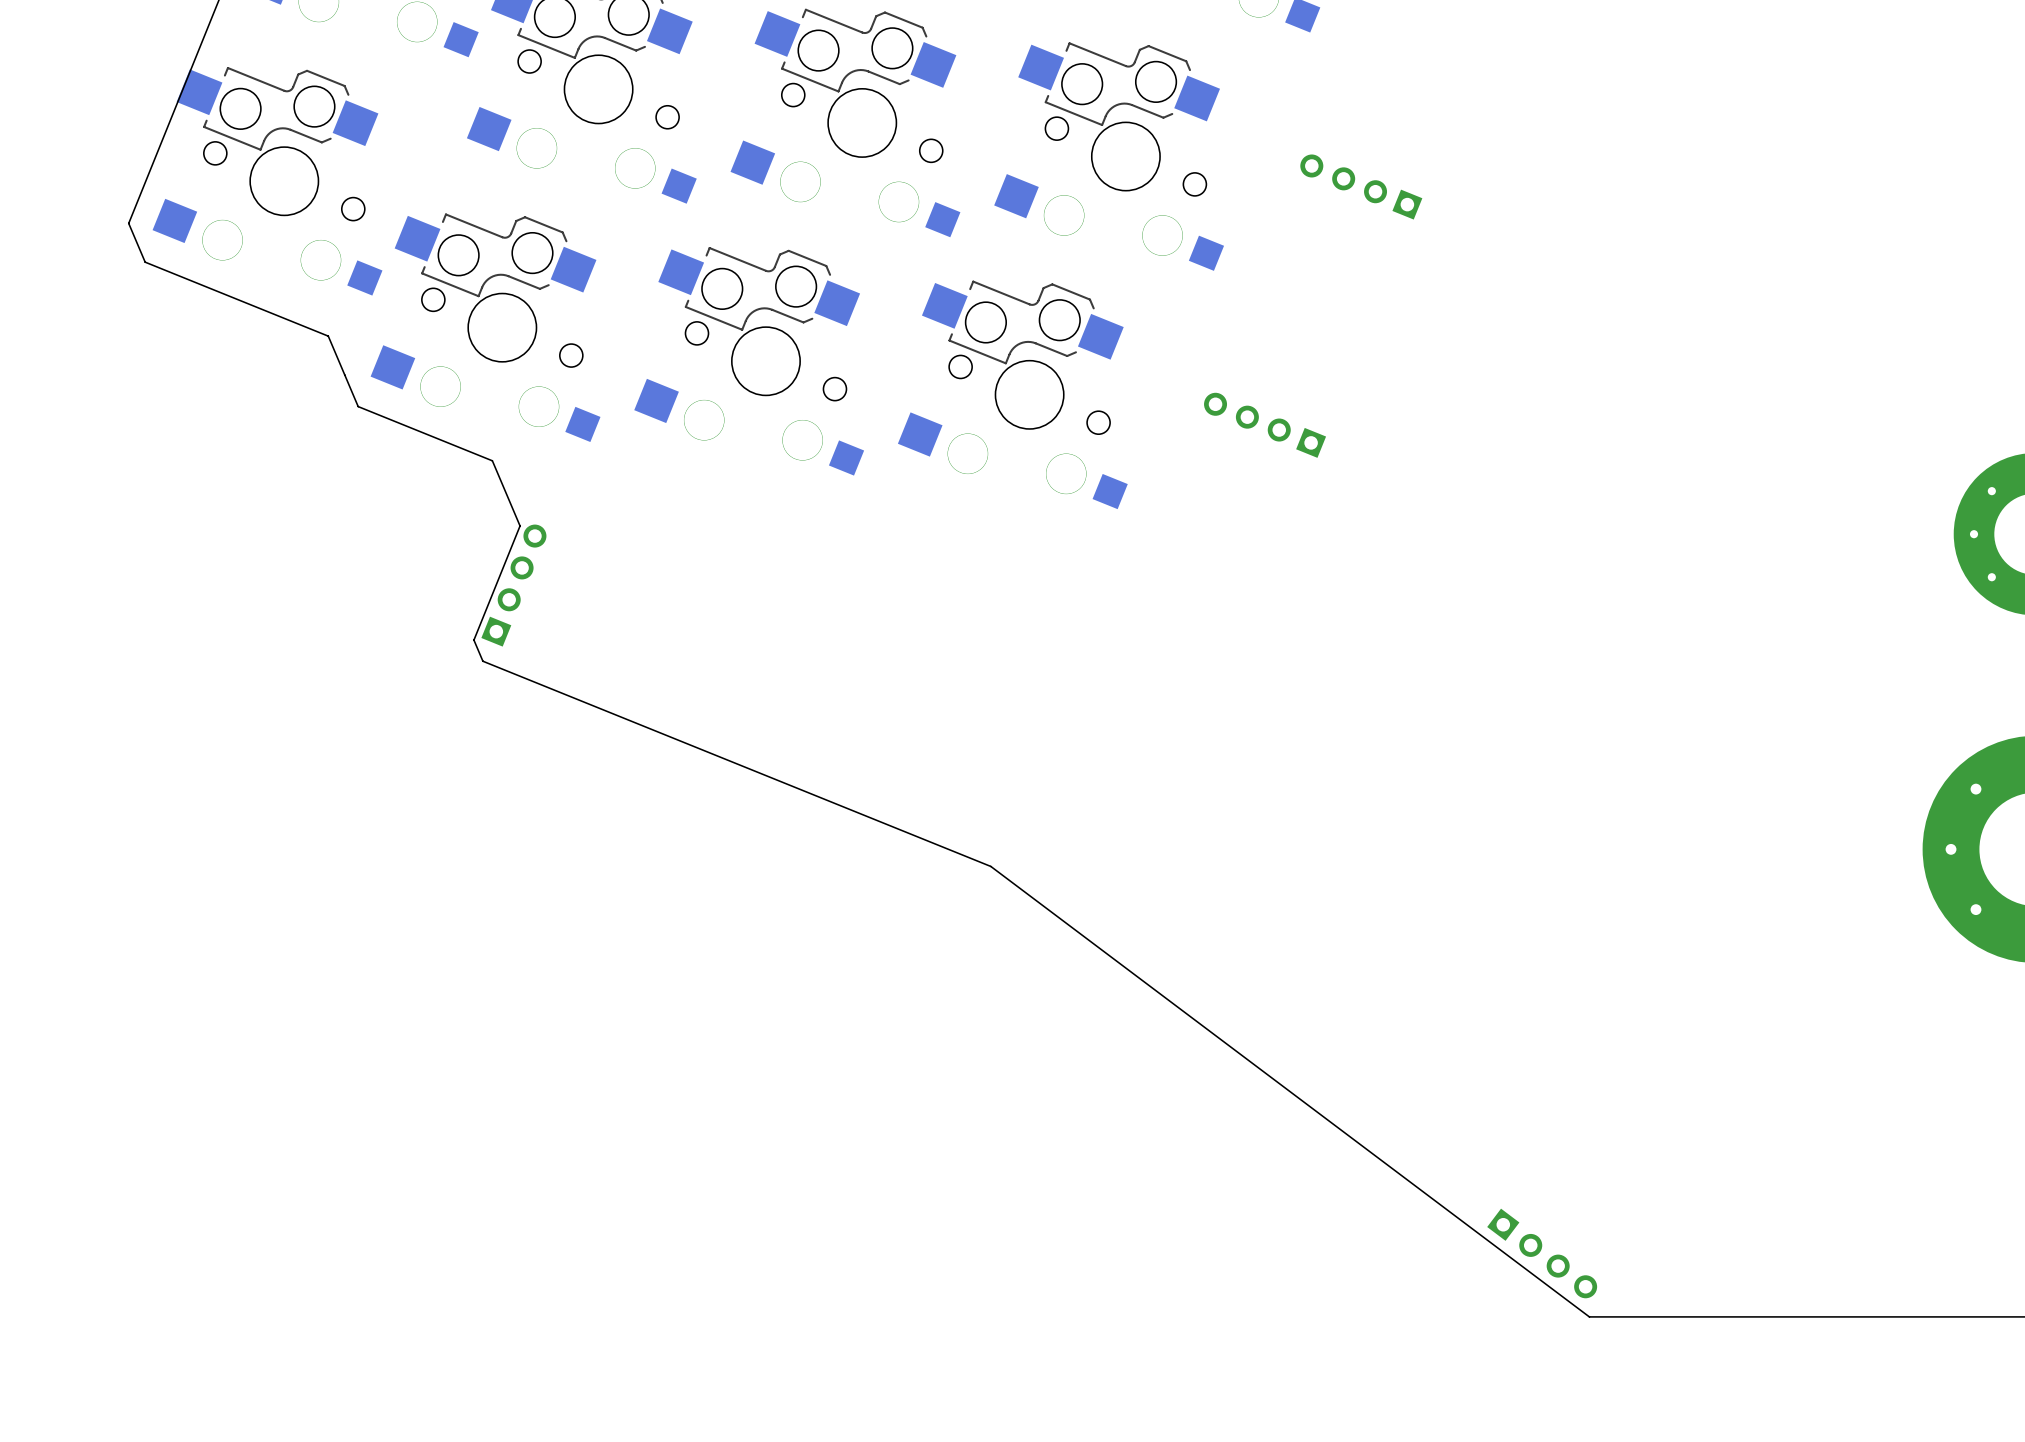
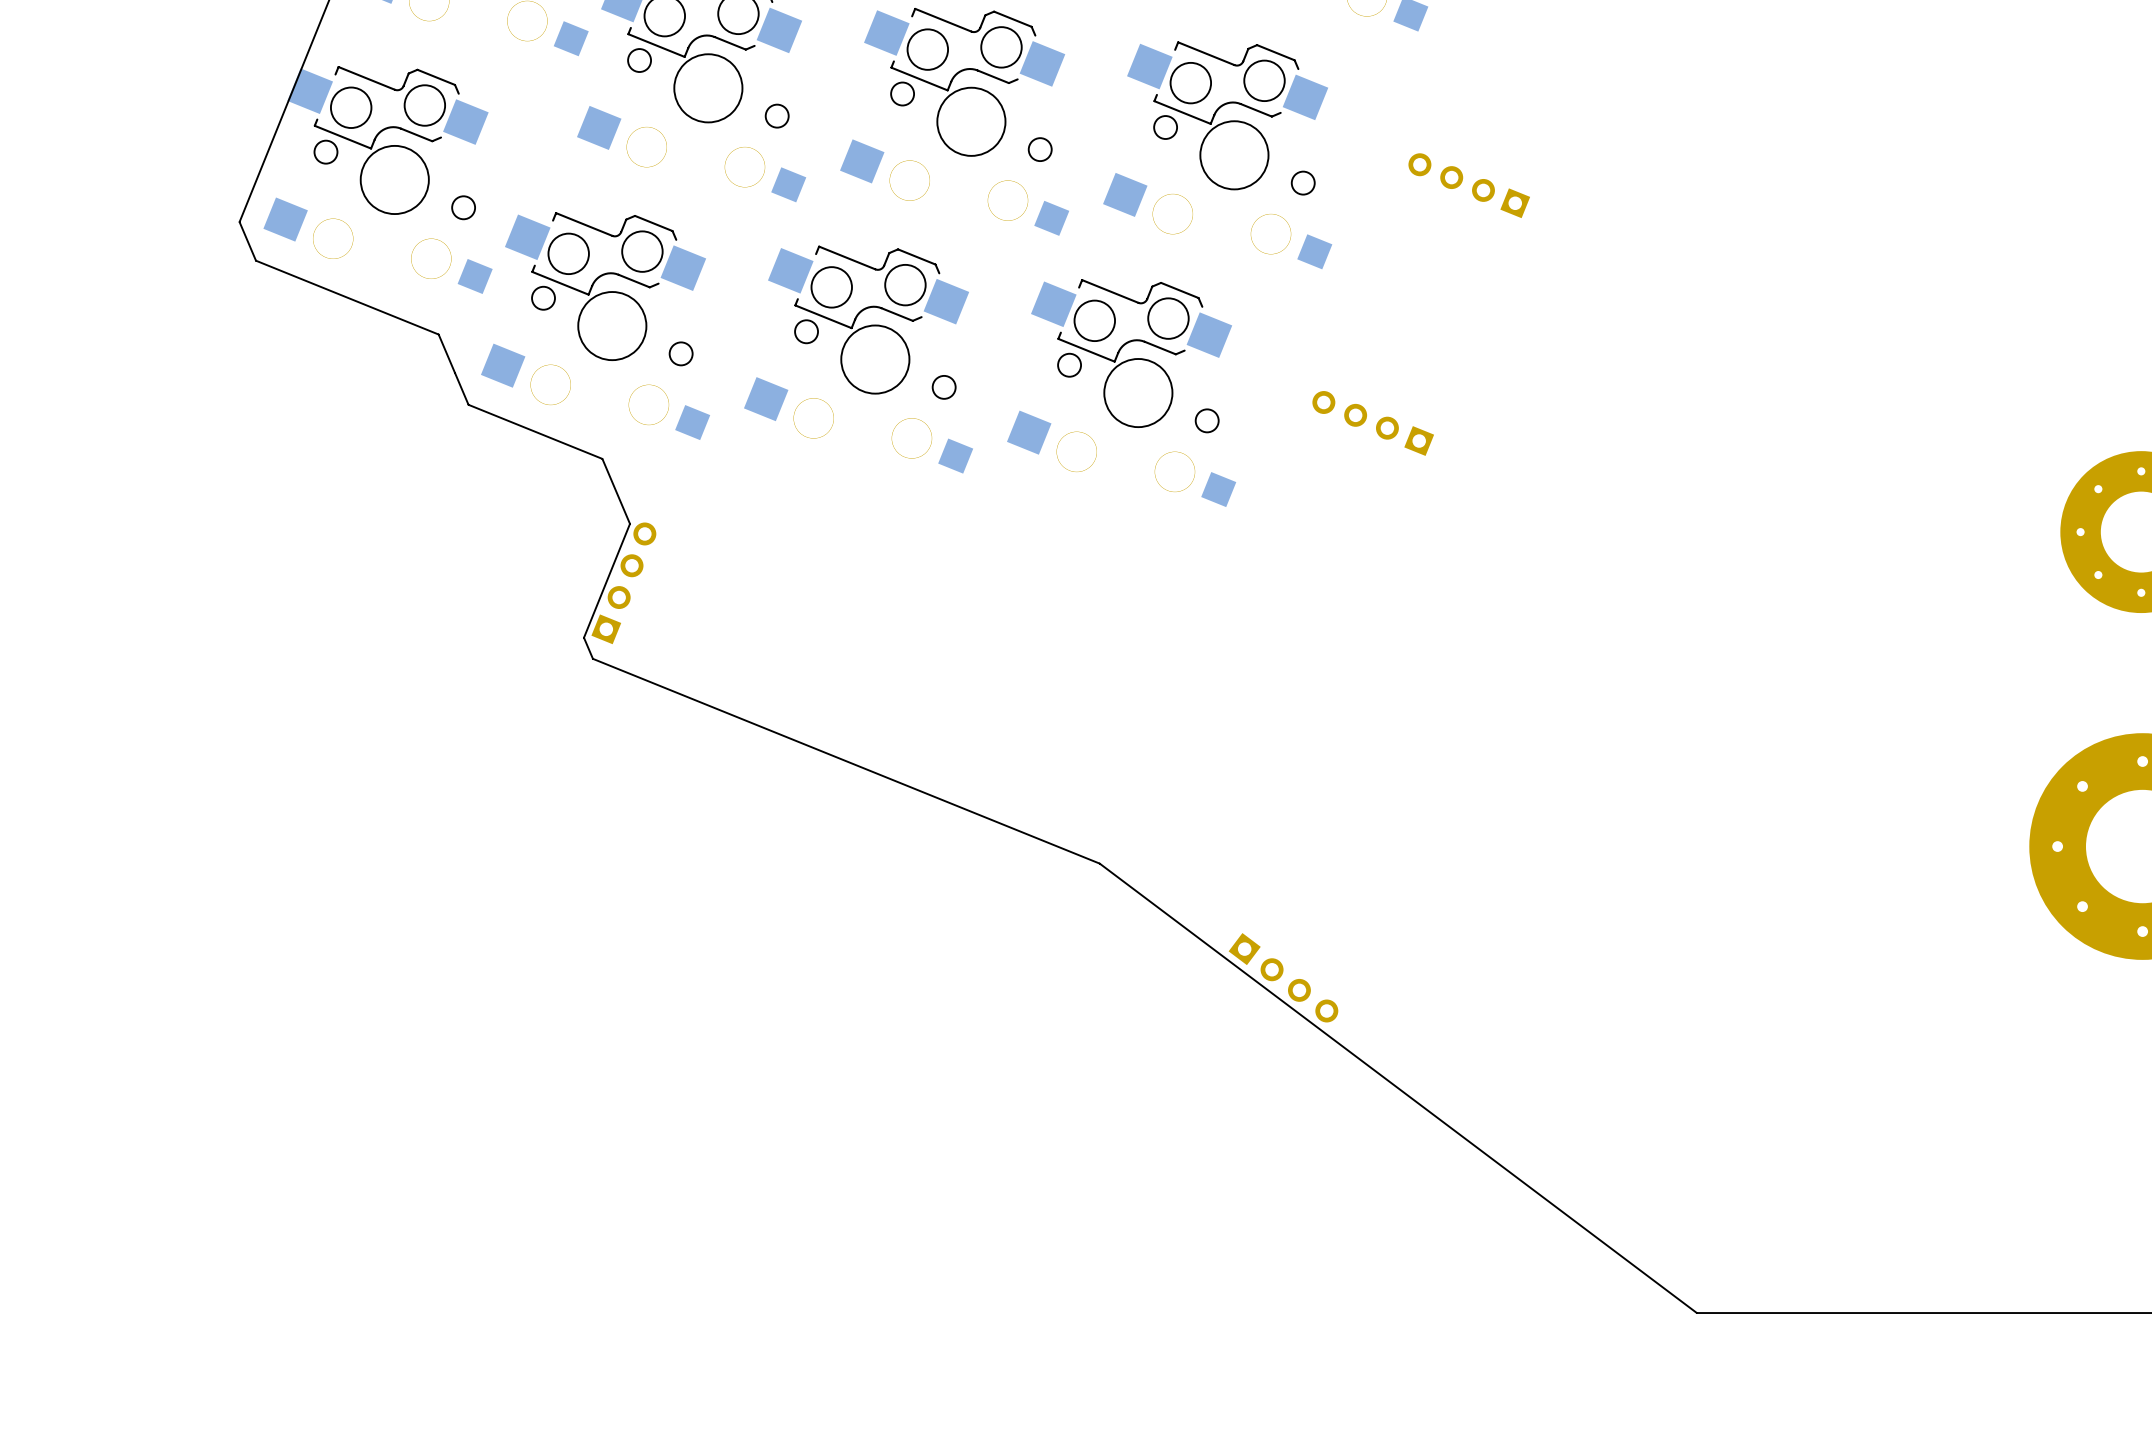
part: none -> (1283, 977)
part: (1542, 1253) -> none

